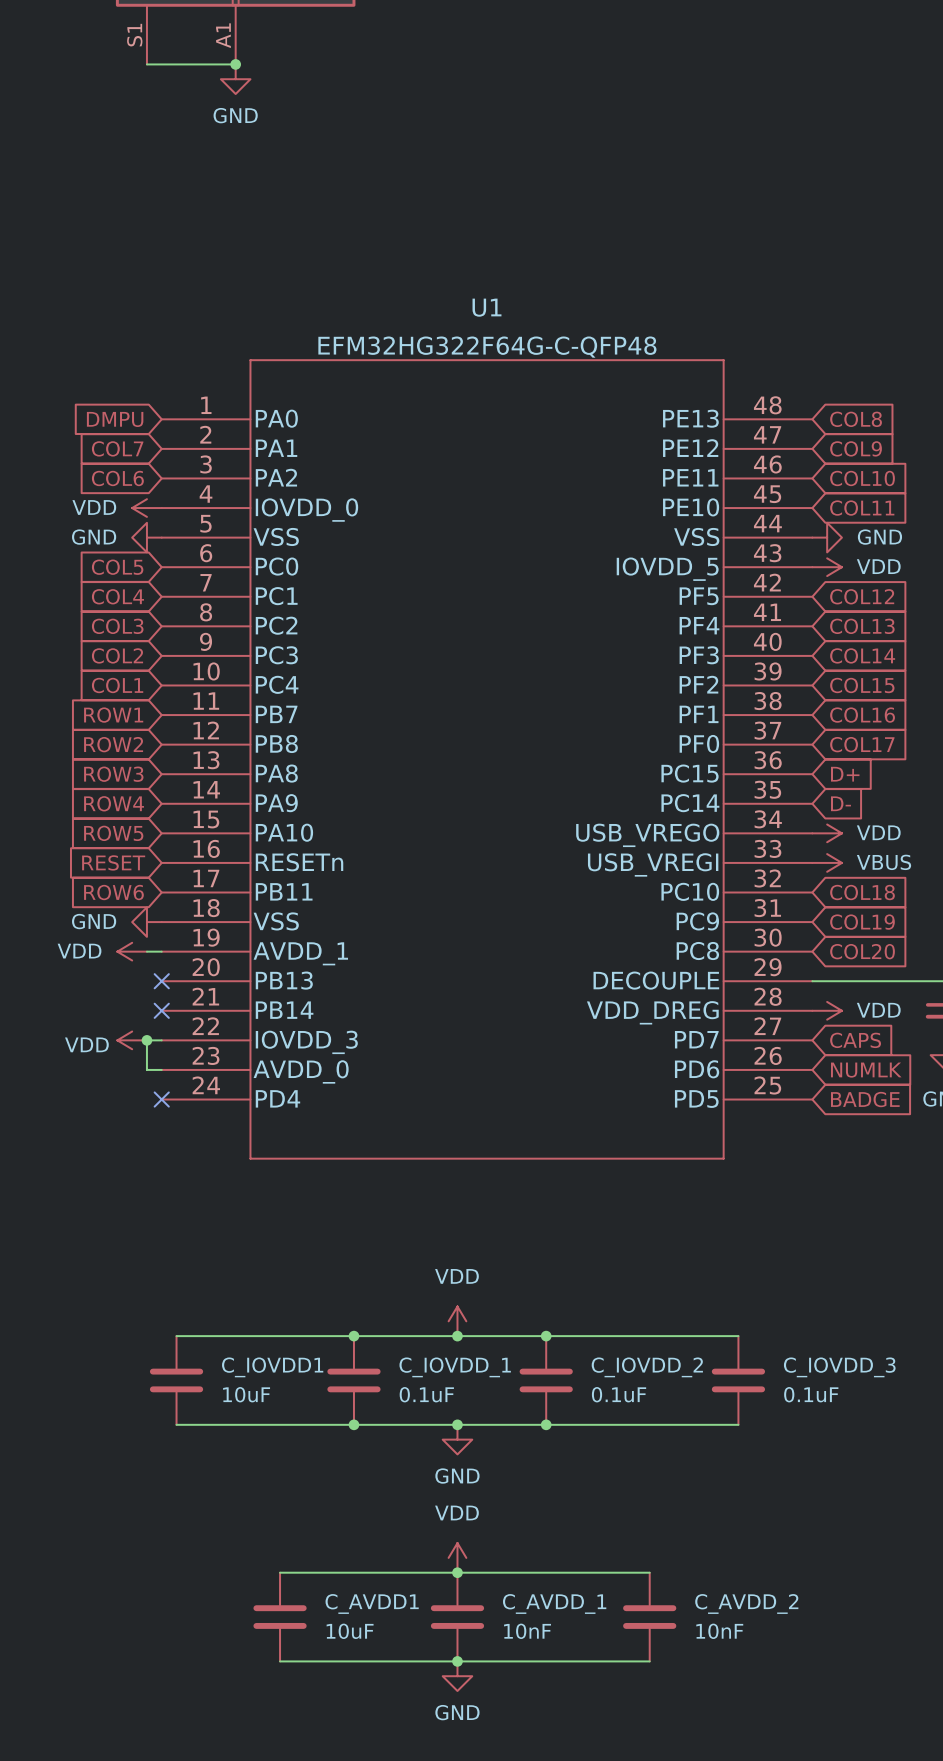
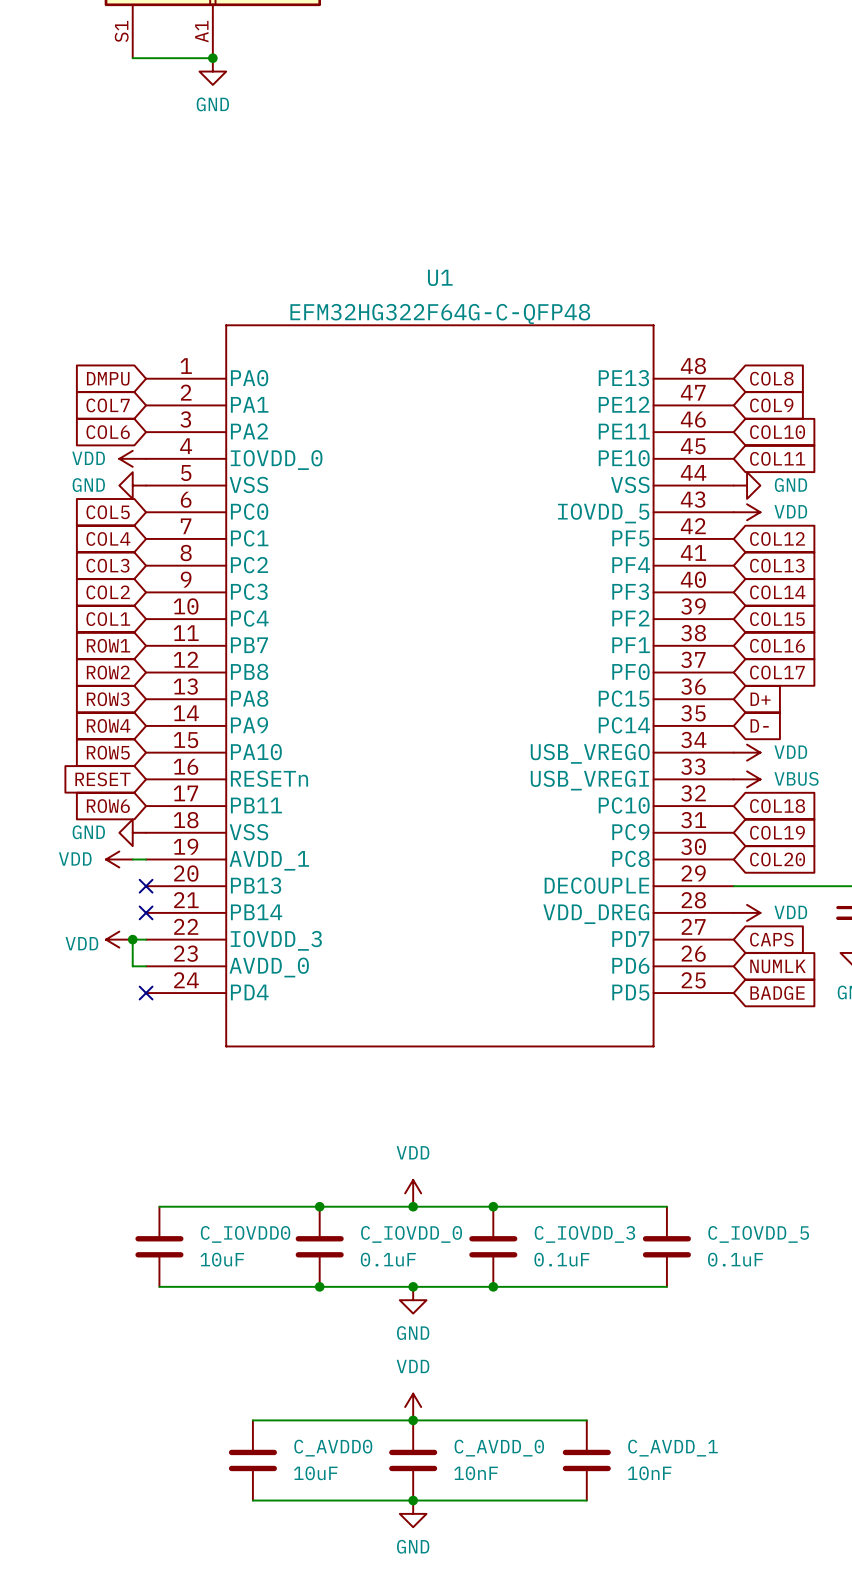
C_IOVDD1 name: C_IOVDD1 (272, 1367) -> C_IOVDD0 (245, 1234)
C_IOVDD_1 name: C_IOVDD_1 (455, 1367) -> C_IOVDD_0 (411, 1234)
C_IOVDD_2 name: C_IOVDD_2 (647, 1367) -> C_IOVDD_3 (584, 1234)
C_IOVDD_3 name: C_IOVDD_3 (839, 1367) -> C_IOVDD_5 (758, 1234)
C_AVDD1 name: C_AVDD1 (372, 1603) -> C_AVDD0 (333, 1448)
C_AVDD_1 name: C_AVDD_1 (554, 1603) -> C_AVDD_0 (499, 1448)
C_AVDD_2 name: C_AVDD_2 (746, 1603) -> C_AVDD_1 (673, 1448)

